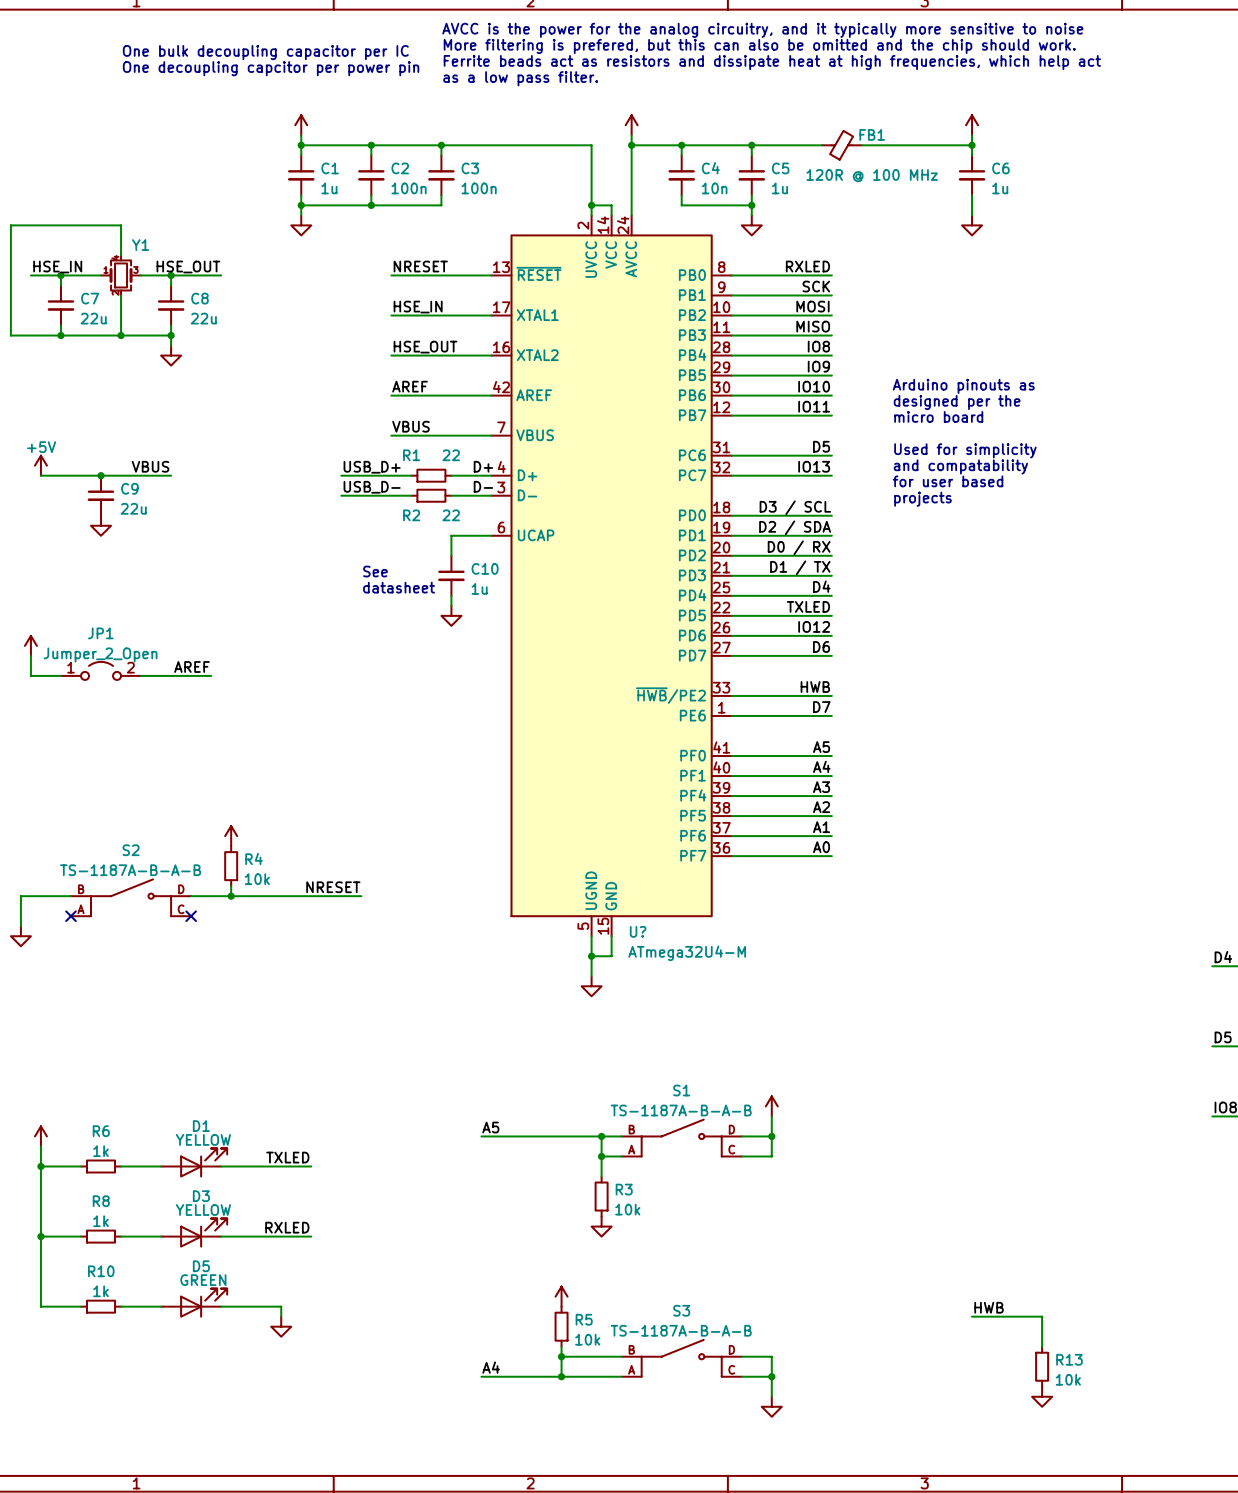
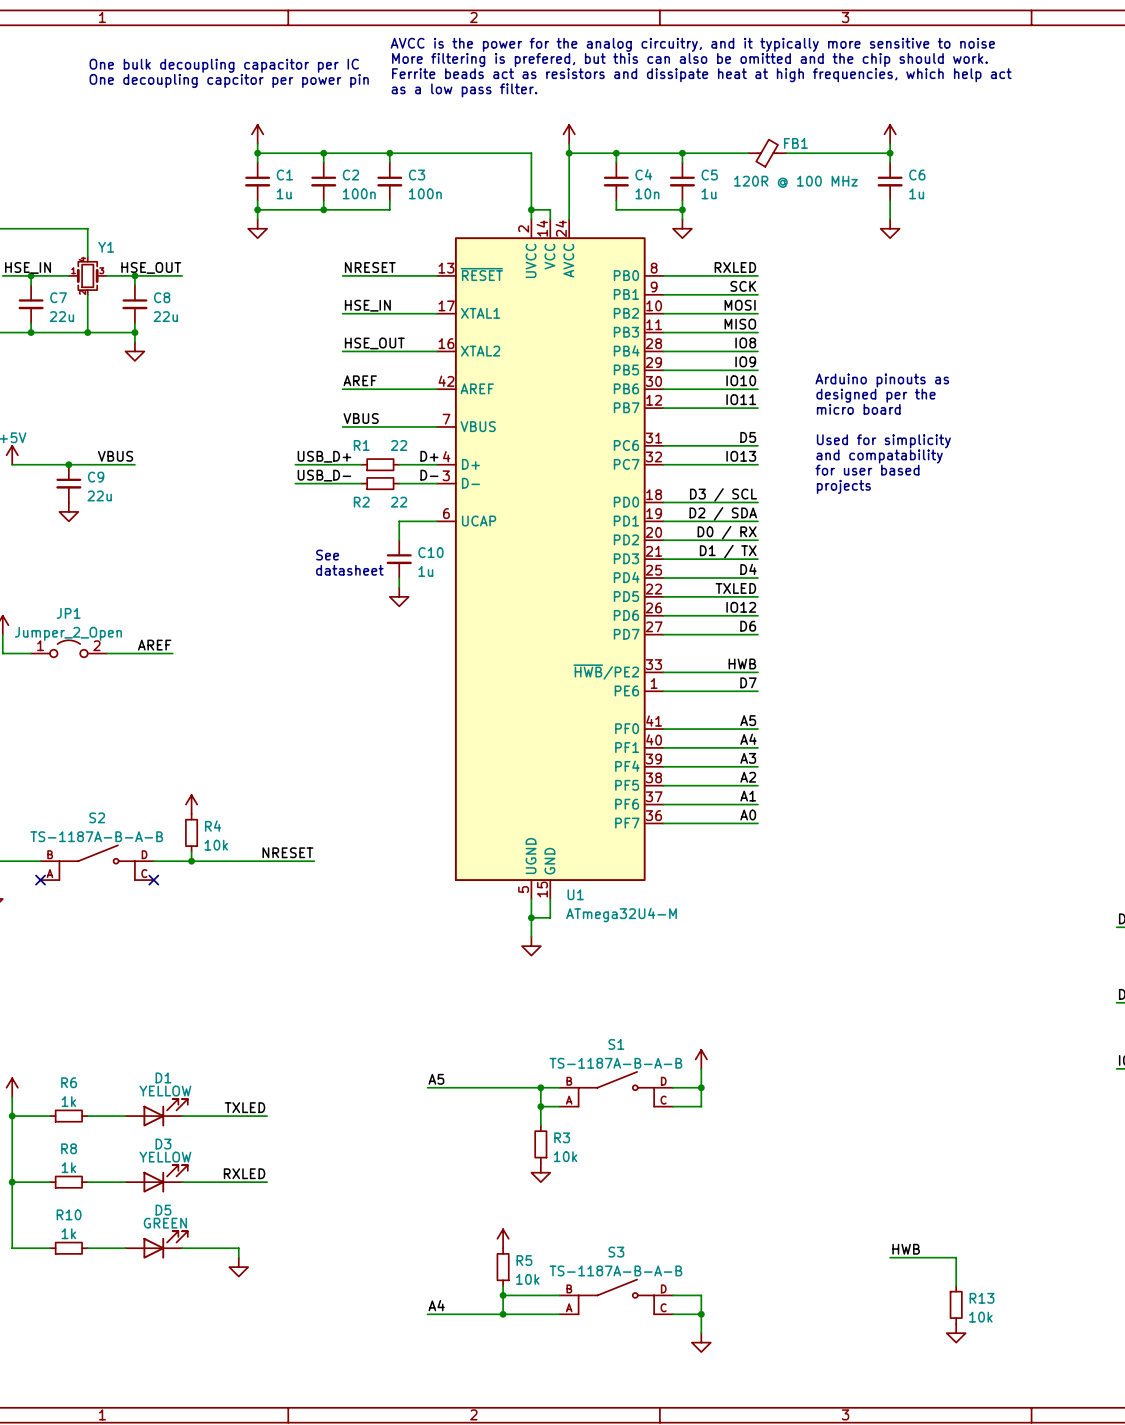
U? name: U? (638, 931) -> U1 (575, 894)

